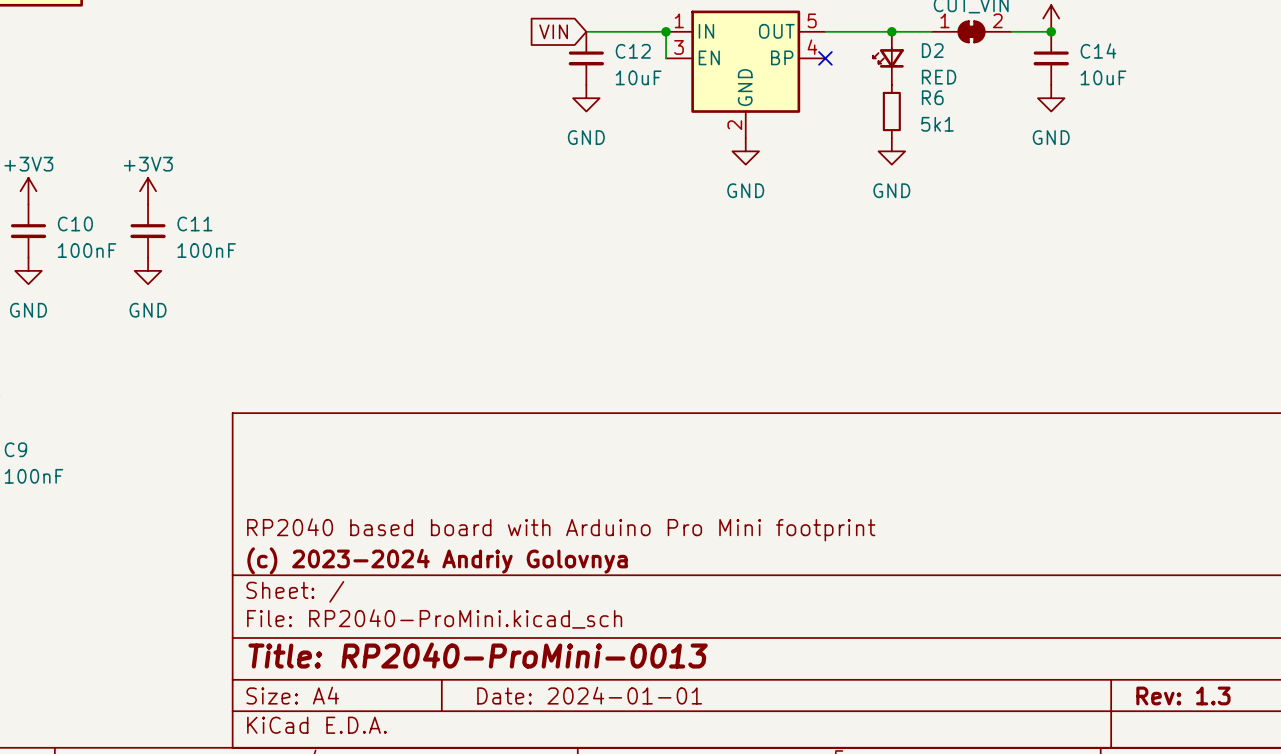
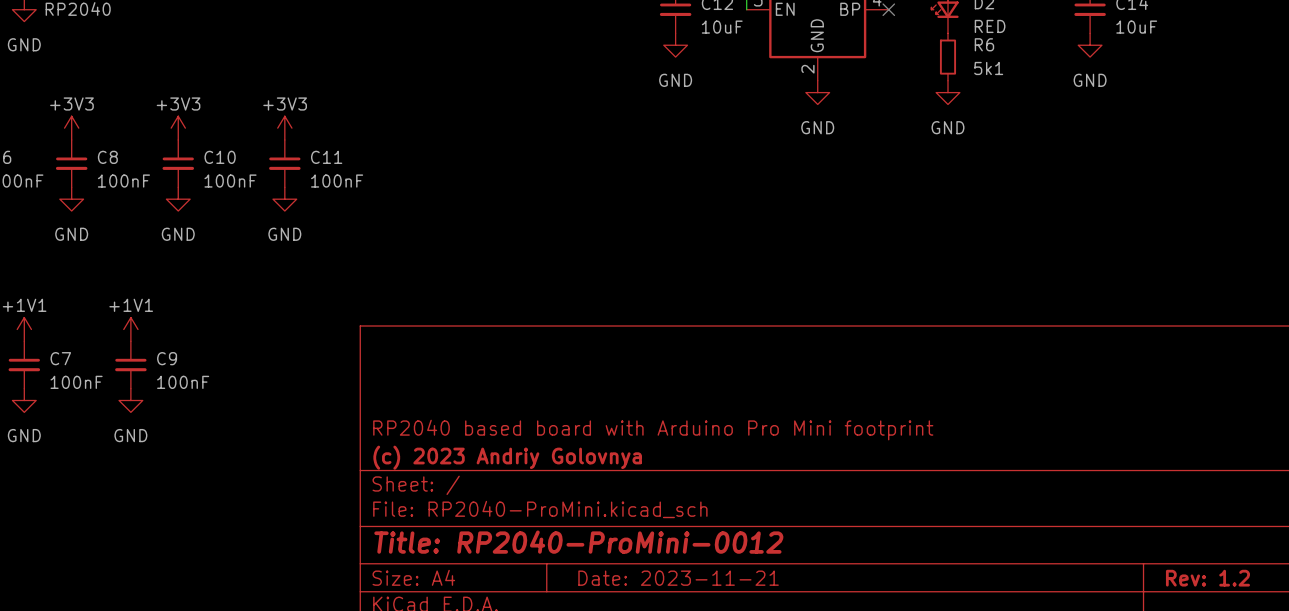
title block: (c) 2023-2024 Andriy Golovnya (437, 560) -> (c) 2023 Andriy Golovnya (507, 457)
title block: Title: RP2040-ProMini-0013 (478, 655) -> Title: RP2040-ProMini-0012 (578, 542)
title block: Date: 2024-01-01 (589, 695) -> Date: 2023-11-21 (678, 578)
title block: Rev: 1.3 (1183, 695) -> Rev: 1.2 (1207, 578)

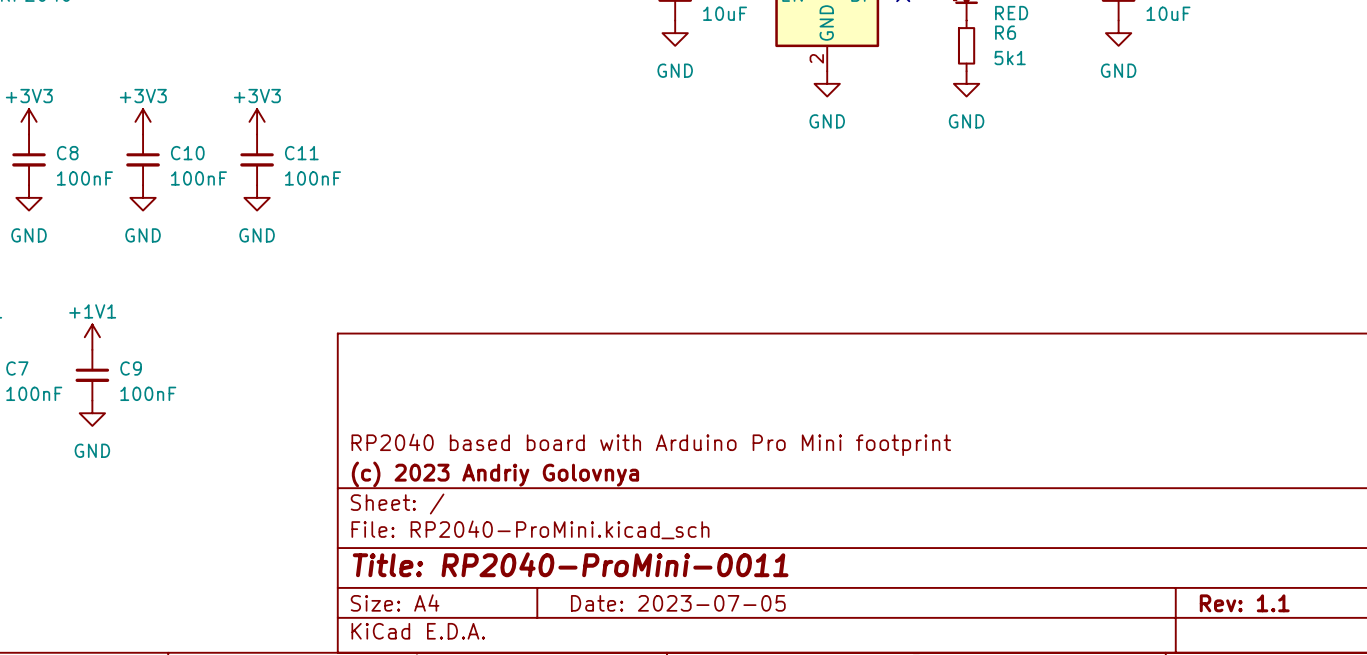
title block: Title: RP2040-ProMini-0012 (578, 542) -> Title: RP2040-ProMini-0011 (570, 564)
title block: Date: 2023-11-21 (678, 578) -> Date: 2023-07-05 (678, 603)
title block: Rev: 1.2 (1207, 578) -> Rev: 1.1 (1244, 603)

